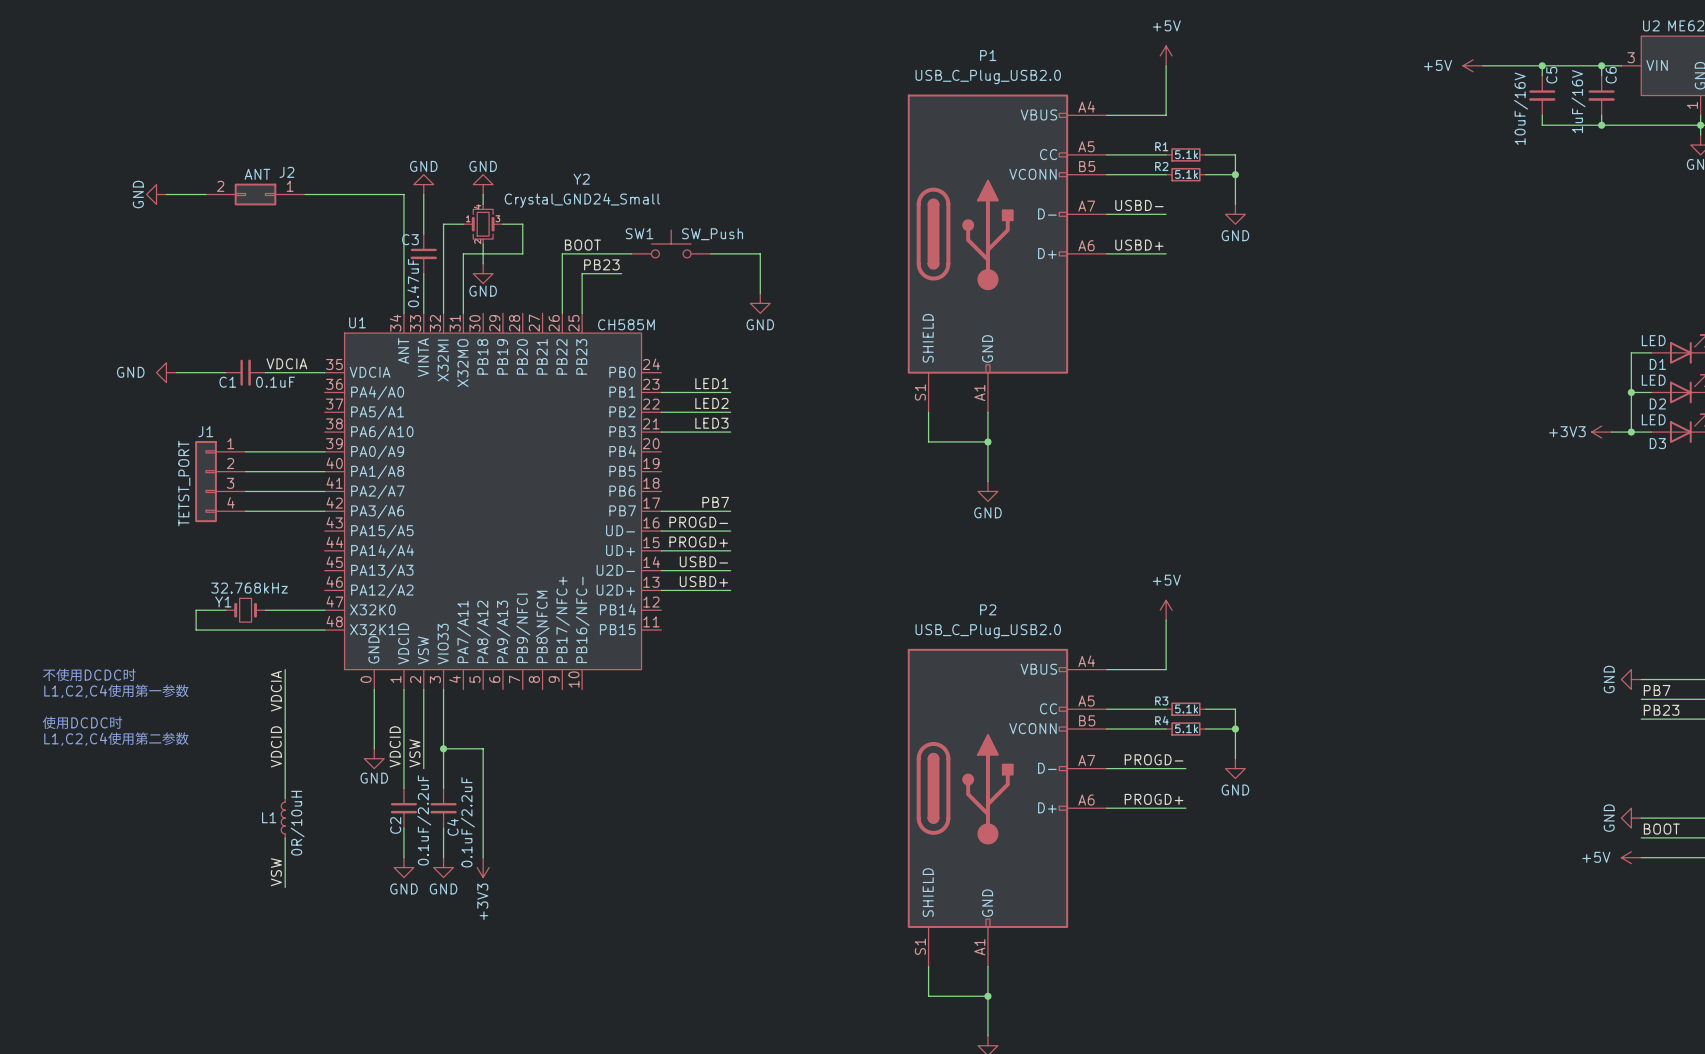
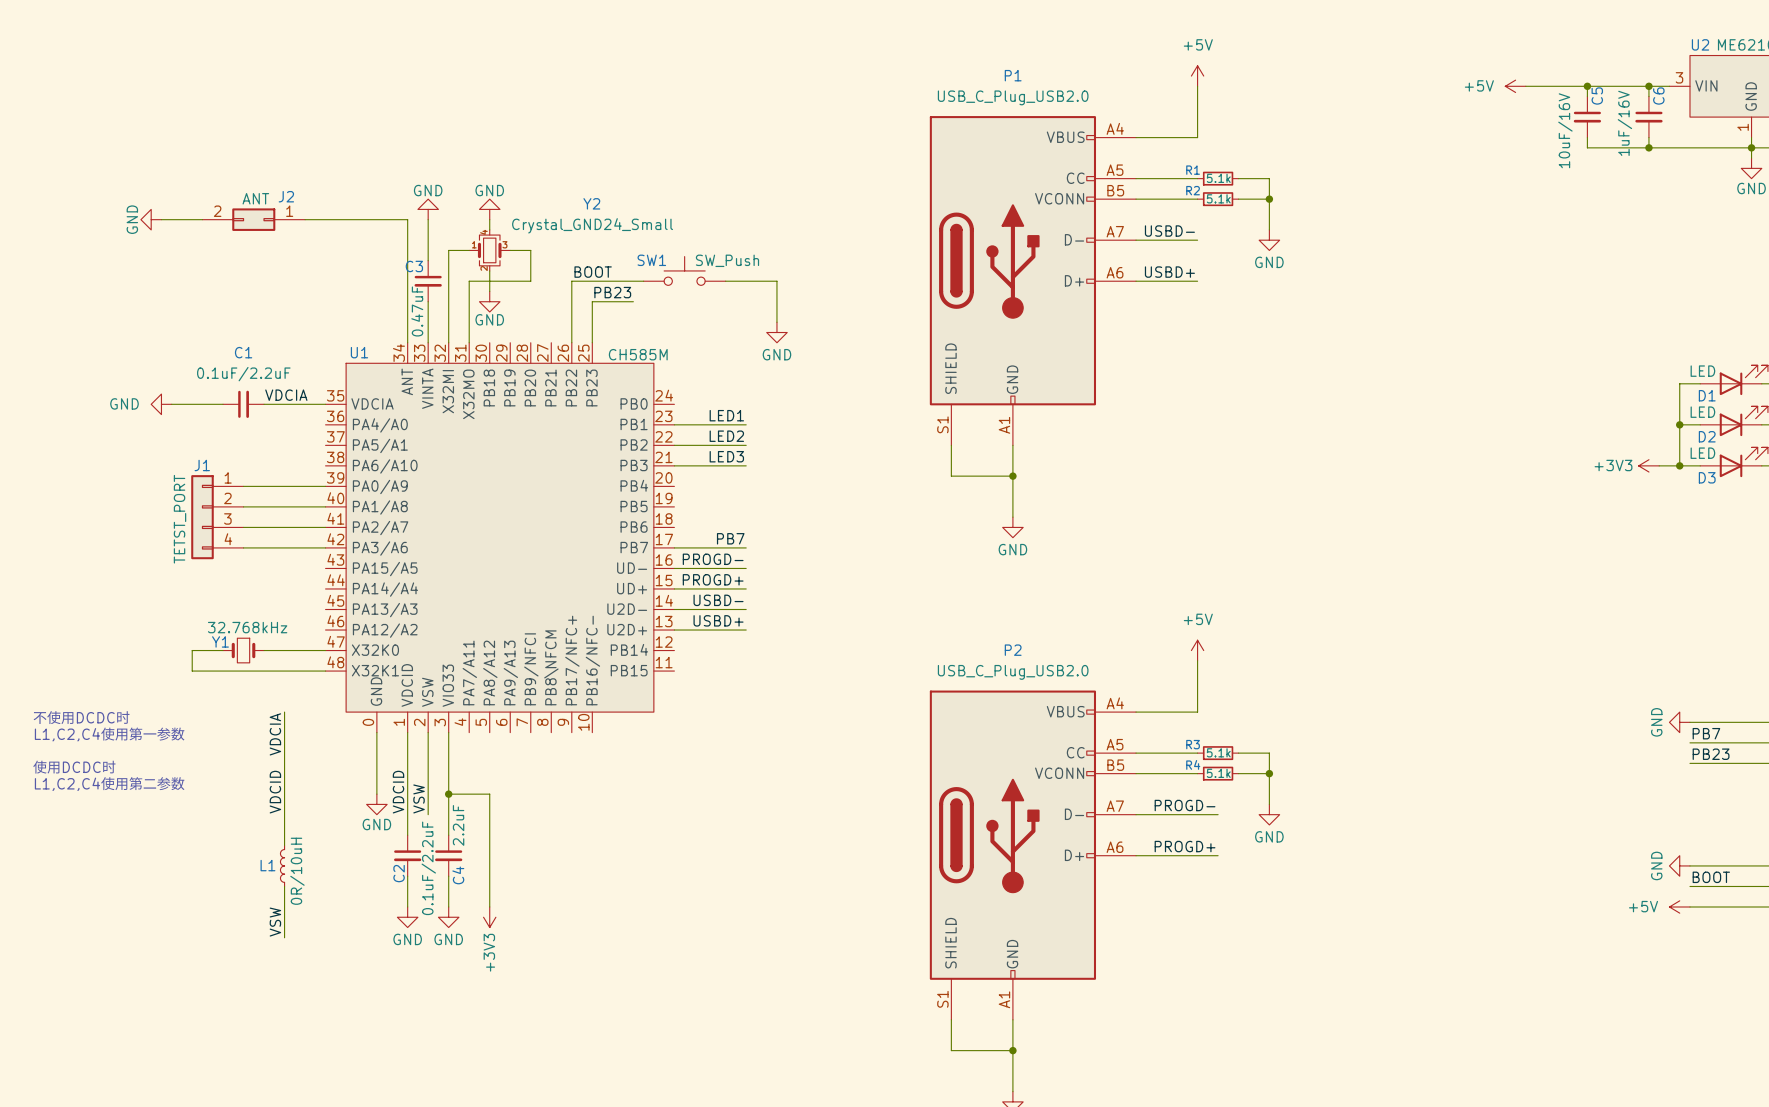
C1 name position: C1 (227, 382) -> C1 (243, 352)
C1 value: 0.1uF (275, 382) -> 0.1uF/2.2uF (243, 374)
C4 value: 0.1uF/2.2uF (467, 822) -> 2.2uF (458, 825)

